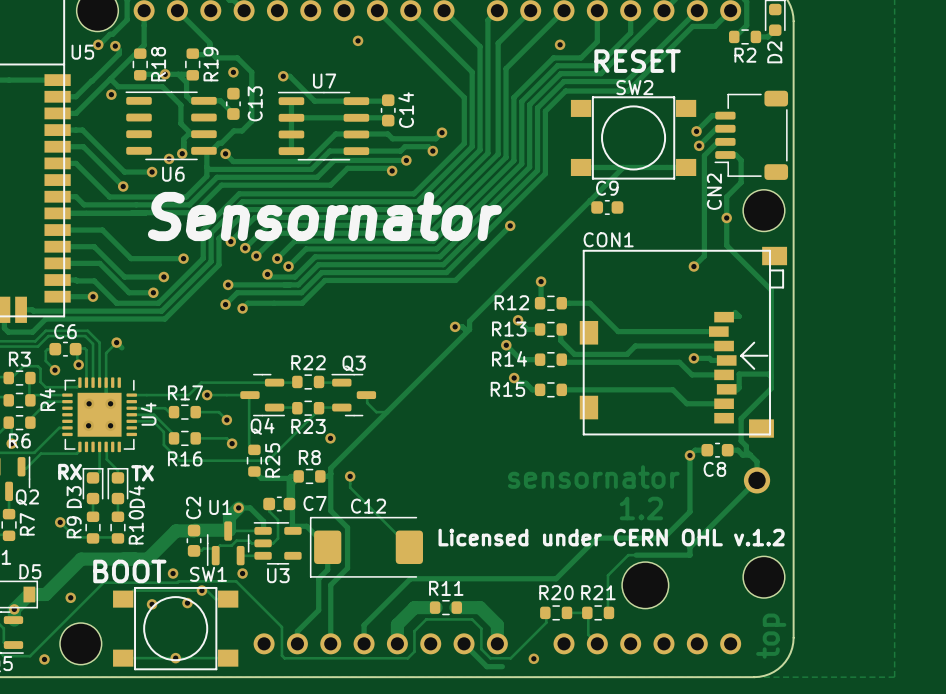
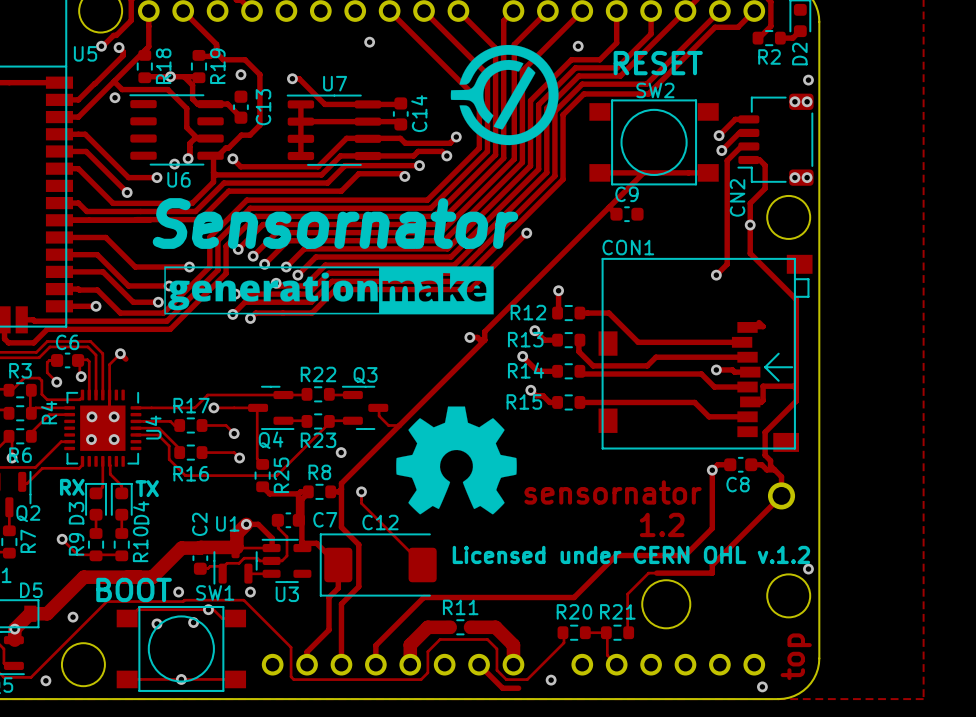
drawing: none -> [450, 44, 559, 146]
via: none -> (808, 80)
via: none -> (794, 101)
via: none -> (807, 101)
via: none -> (794, 177)
via: none -> (807, 177)
drawing: none -> [164, 266, 494, 315]
drawing: none -> [396, 406, 517, 515]
via: none -> (808, 569)
via: none -> (762, 686)

